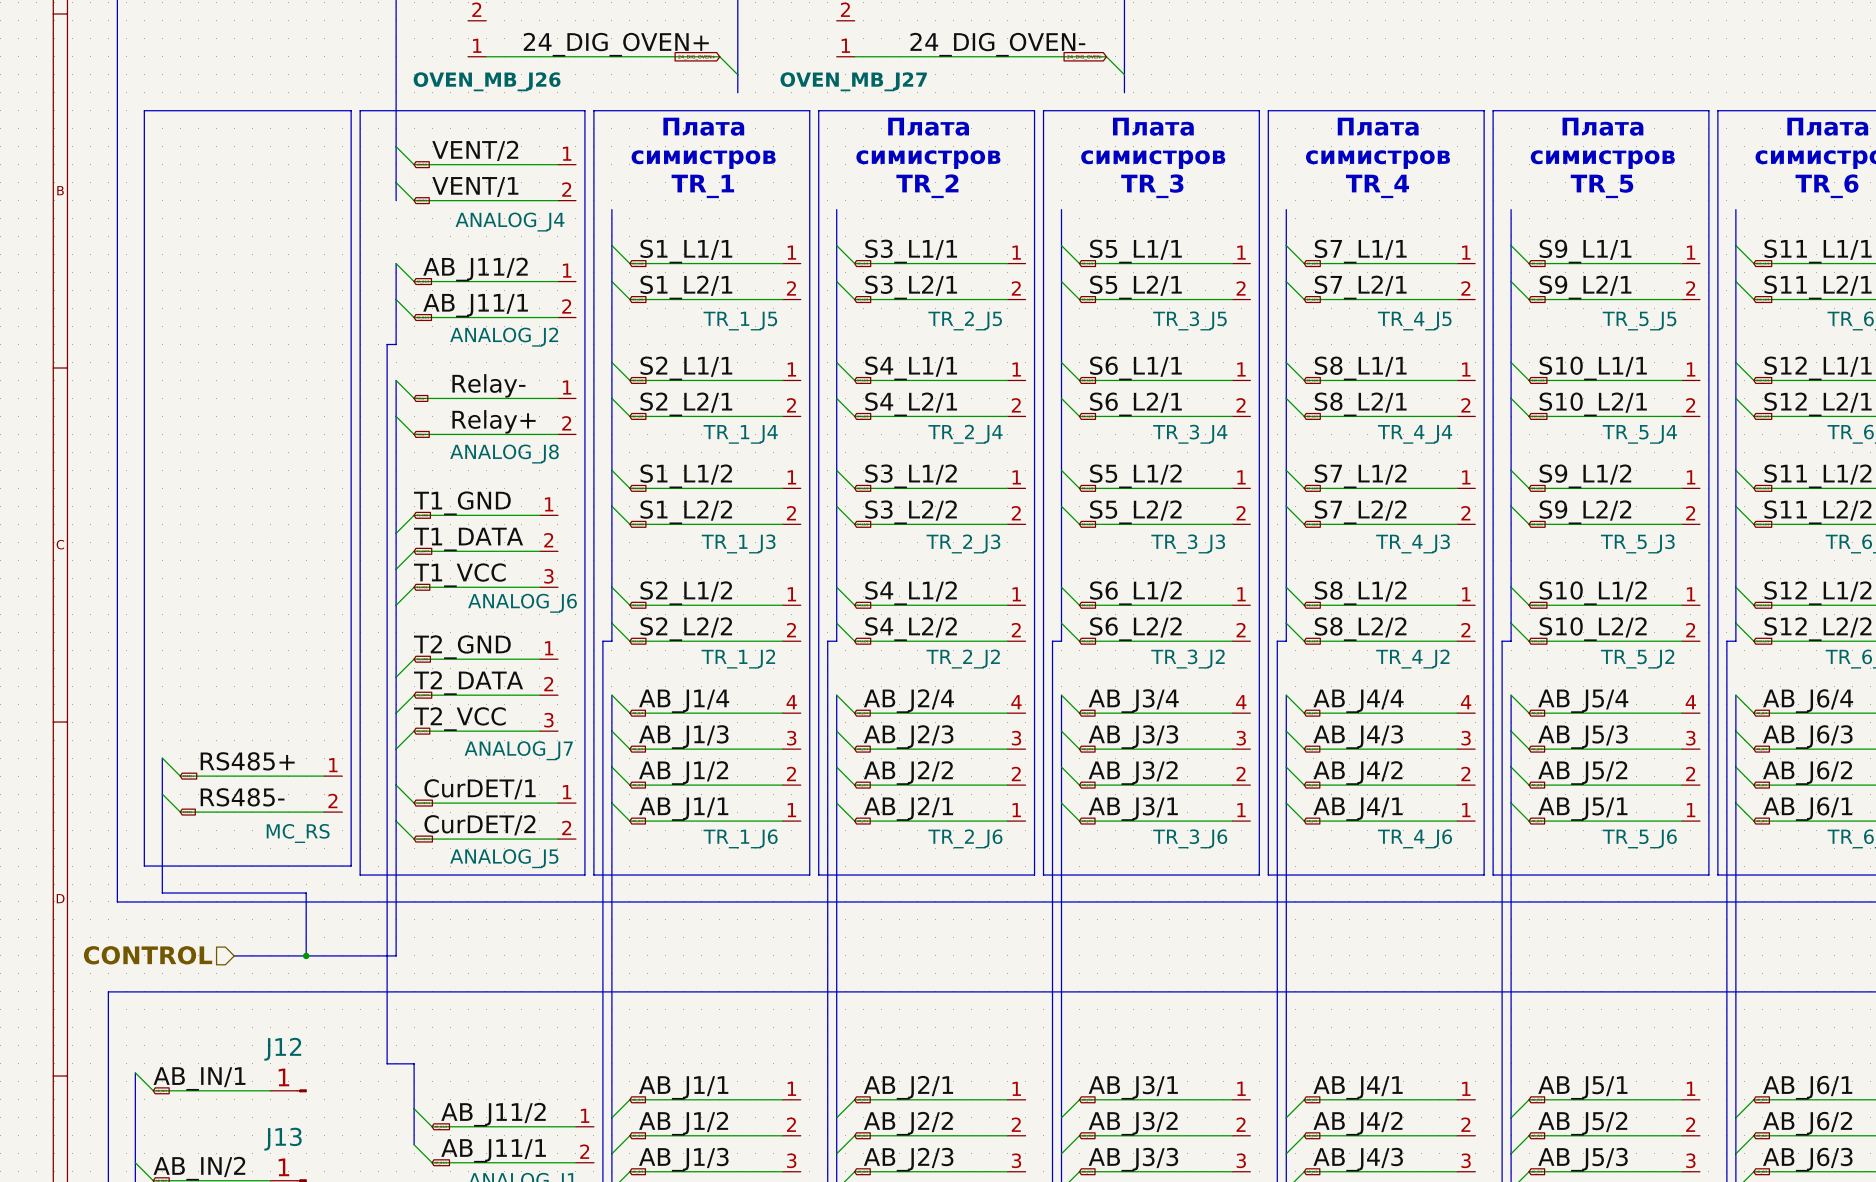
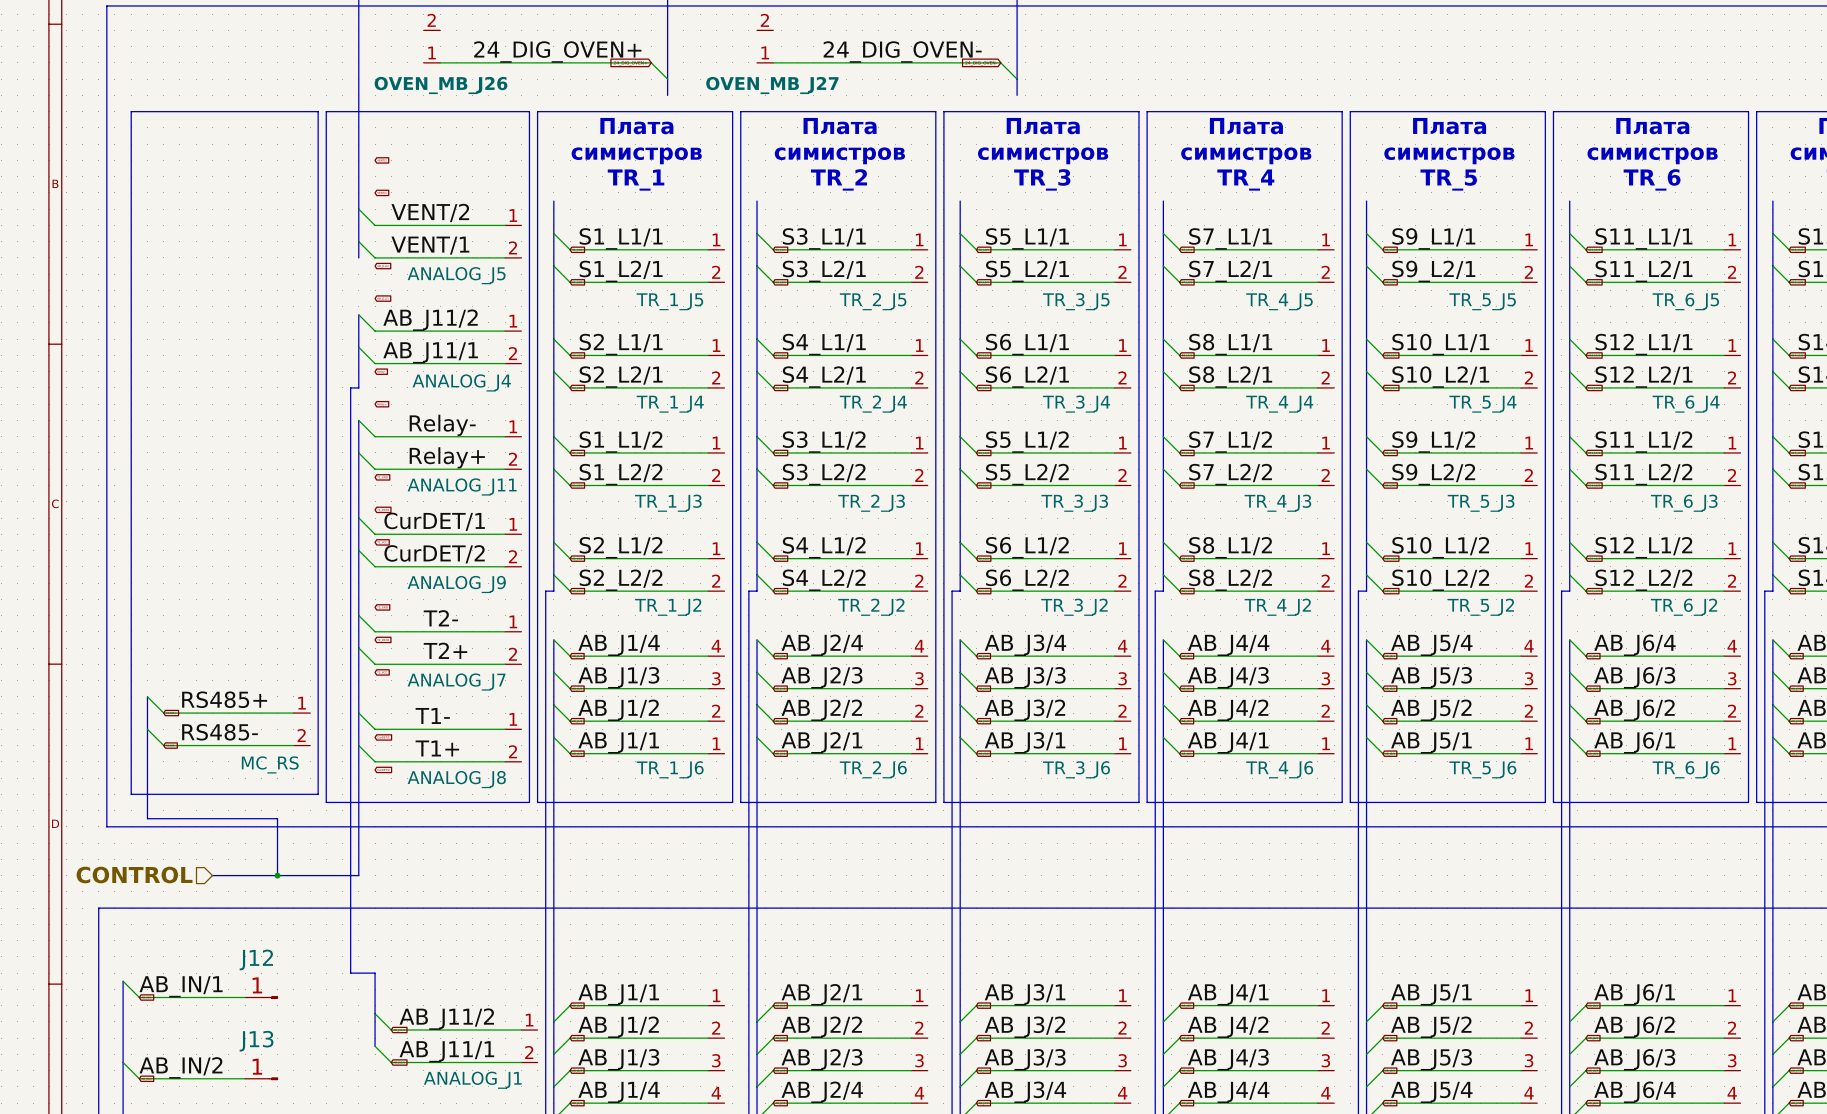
wire: (396, 146) (414, 164) (557, 164) -> (358, 209) (375, 225) (505, 225)
label position: VENT/2 (475, 150) -> VENT/2 (430, 212)
wire: (396, 182) (414, 200) (557, 200) -> (358, 241) (375, 257) (505, 257)
ANALOG_J4 position: (566, 182) -> (513, 347)
label position: VENT/1 (475, 187) -> VENT/1 (430, 245)
wire: (396, 263) (414, 281) (557, 281) -> (358, 314) (375, 331) (505, 331)
label position: AB_J11/2 (475, 269) -> AB_J11/2 (430, 320)
bus: (396, 272) (396, 335) -> (358, 192) (358, 249)
wire: (396, 299) (414, 317) (557, 317) -> (358, 347) (375, 363) (505, 363)
ANALOG_J2: (566, 299) -> none
label position: AB_J11/1 (475, 305) -> AB_J11/1 (430, 352)
bus: (396, 344) (387, 344) (387, 416) -> (358, 322) (358, 355)
wire: (396, 380) (414, 398) (557, 398) -> (358, 420) (375, 436) (505, 436)
label position: Relay- (488, 385) -> Relay- (442, 425)
wire: (396, 416) (414, 434) (557, 434) -> (358, 452) (375, 469) (505, 469)
bus: (396, 416) (396, 452) -> (358, 387) (350, 387)
ANALOG_J8 position: (566, 416) -> (513, 745)
label position: Relay+ (494, 421) -> Relay+ (447, 457)
ANALOG_J11: none -> (513, 452)
label: T1_GND (462, 503) -> none
wire: (539, 515) (414, 515) (396, 533) -> none
label: T1_DATA (468, 539) -> none
wire: (539, 551) (414, 551) (396, 569) -> none
ANALOG_J6: (548, 551) -> none
wire: none -> (358, 518) (375, 534) (505, 534)
label: none -> CurDET/1 (434, 521)
label: T1_VCC (459, 575) -> none
wire: (539, 587) (414, 587) (396, 605) -> none
wire: none -> (358, 550) (375, 566) (505, 566)
ANALOG_J9: none -> (513, 550)
label: none -> CurDET/2 (434, 554)
label: T2_GND (462, 647) -> none
wire: (539, 659) (414, 659) (396, 677) -> none
ANALOG_J7 symbol: [539, 659, 558, 732] -> [505, 631, 522, 665]
wire: none -> (358, 615) (375, 631) (505, 631)
label: none -> T2- (440, 618)
label: T2_DATA (468, 683) -> none
wire: (539, 695) (414, 695) (396, 713) -> none
label: none -> T2+ (445, 650)
label: T2_VCC (459, 719) -> none
wire: (539, 731) (414, 731) (396, 749) -> none
ANALOG_J7 name position: ANALOG_J7 (518, 750) -> ANALOG_J7 (456, 682)
label: none -> T1- (432, 715)
wire: (396, 785) (414, 803) (557, 803) -> (358, 648) (375, 664) (505, 664)
label: CurDET/1 (480, 789) -> none
wire: none -> (358, 745) (375, 761) (505, 761)
label: none -> T1+ (437, 748)
wire: (396, 821) (414, 839) (557, 839) -> (358, 713) (375, 729) (505, 729)
ANALOG_J5 position: (566, 821) -> (513, 241)
label: CurDET/2 (479, 825) -> none

